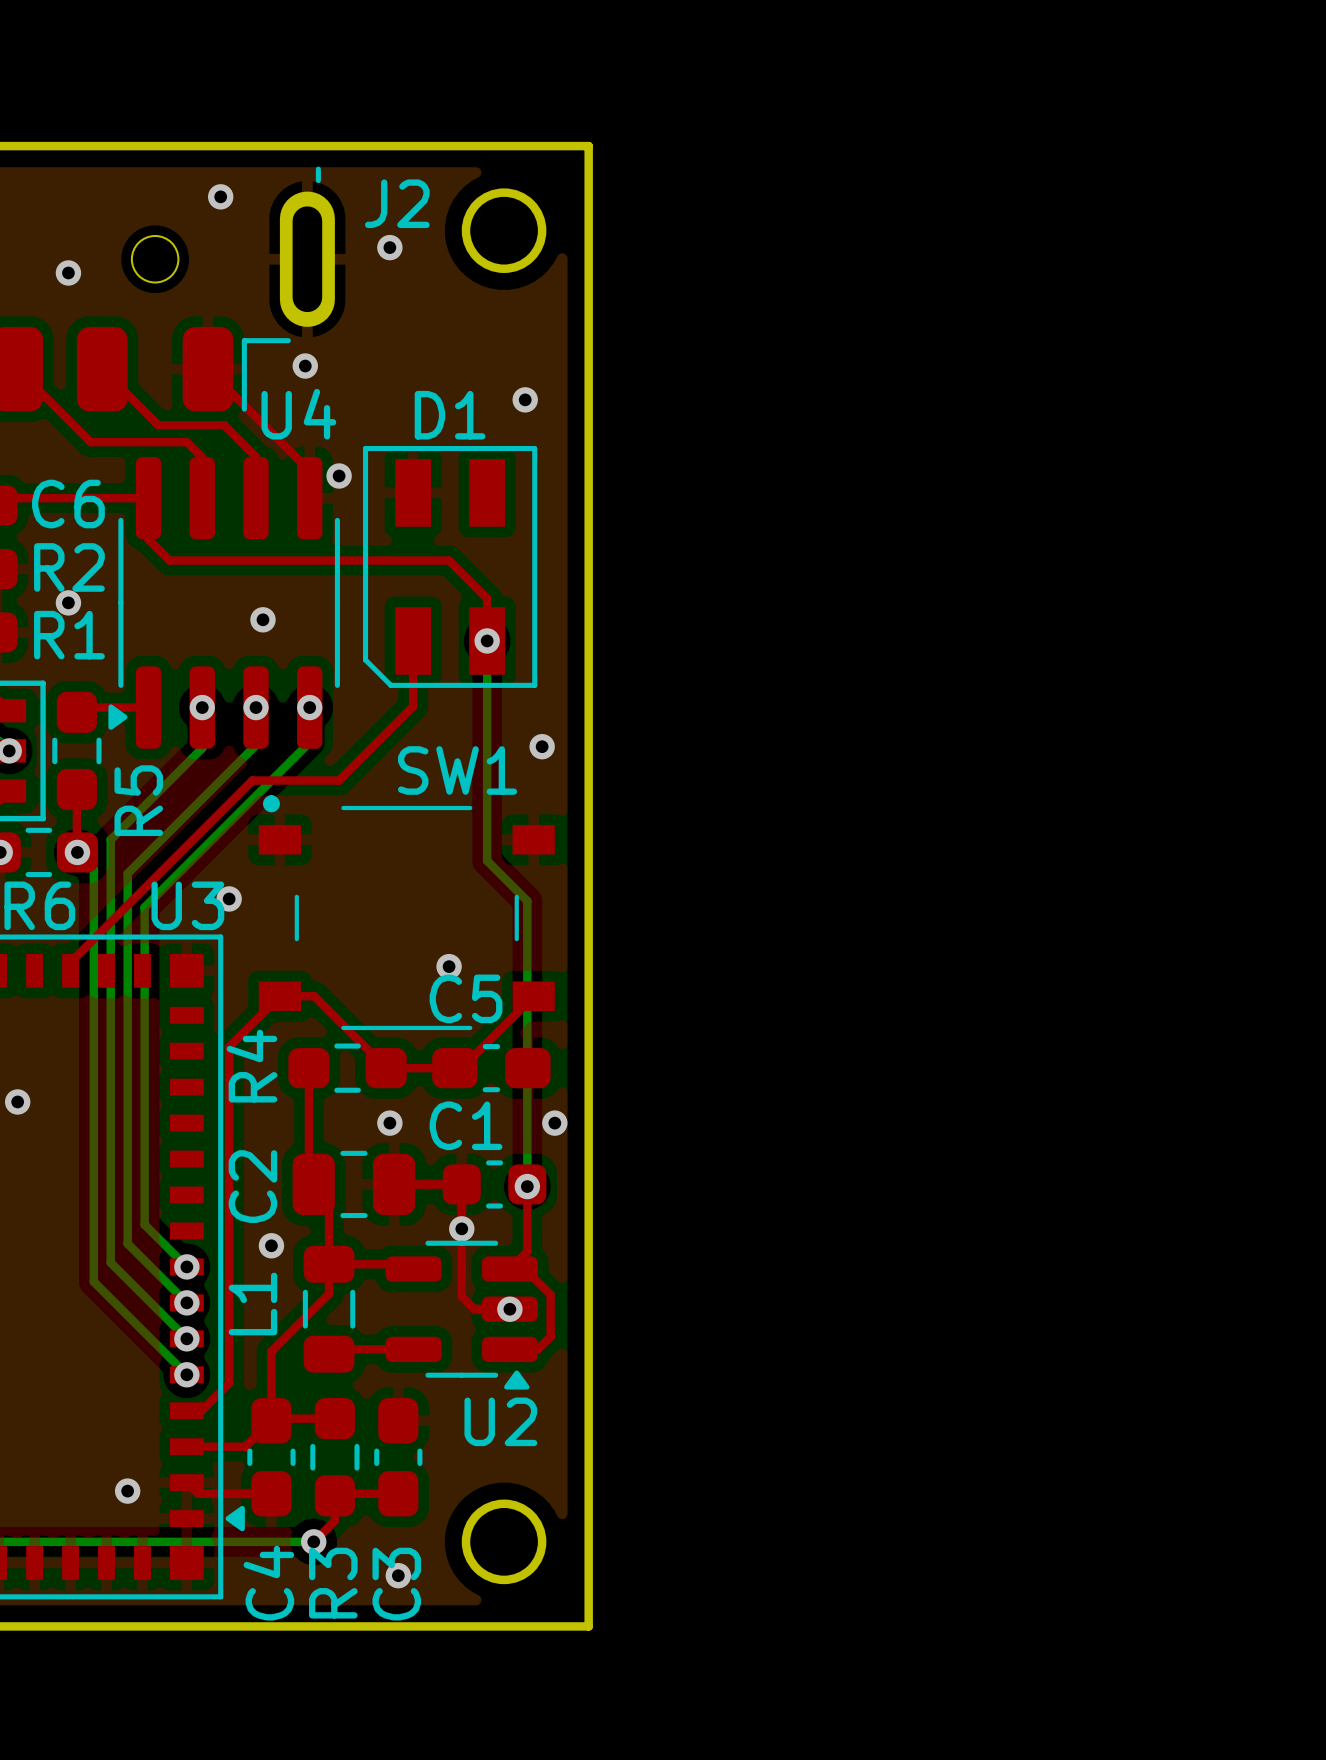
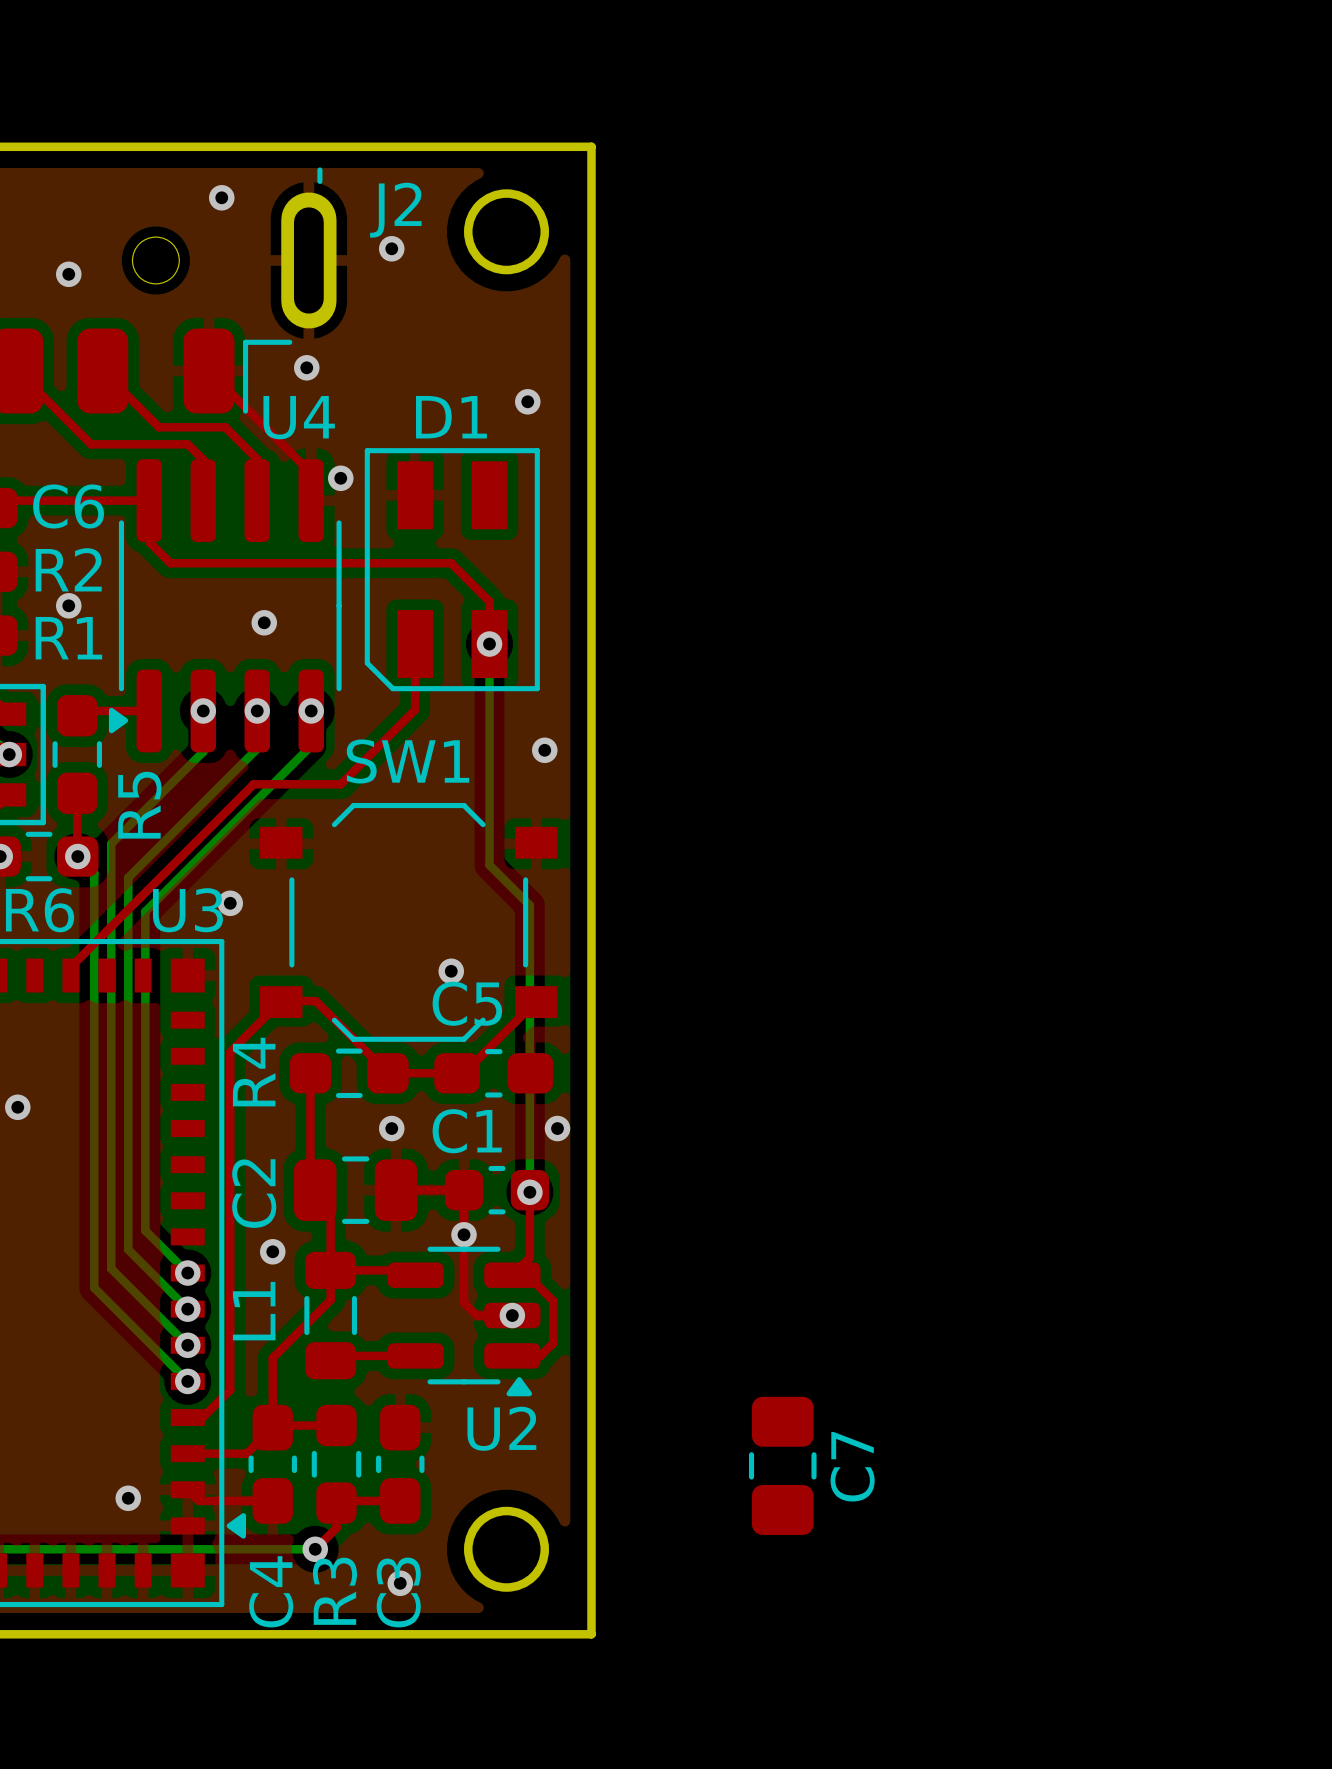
SW1 footprint: [258, 795, 555, 1031] -> [260, 802, 558, 1042]
C7: none -> (782, 1465)

